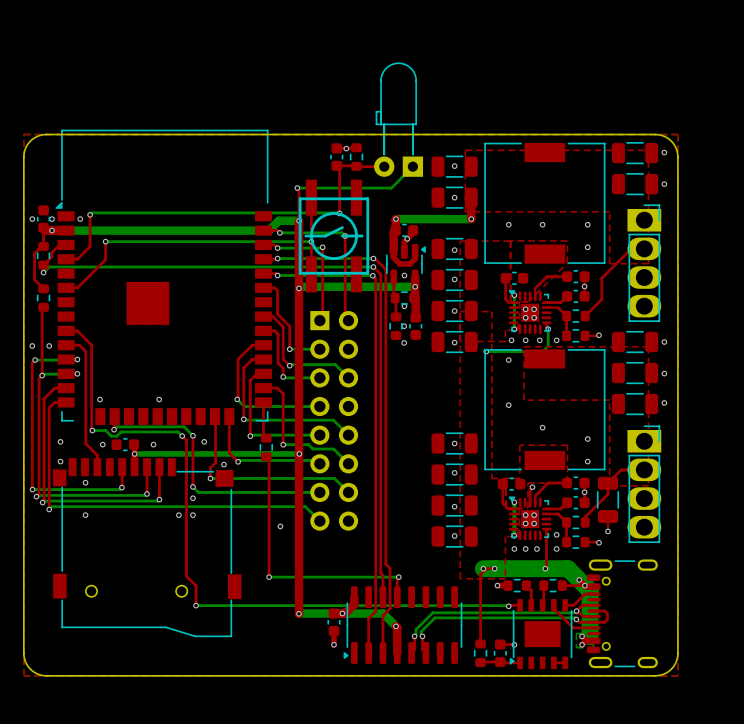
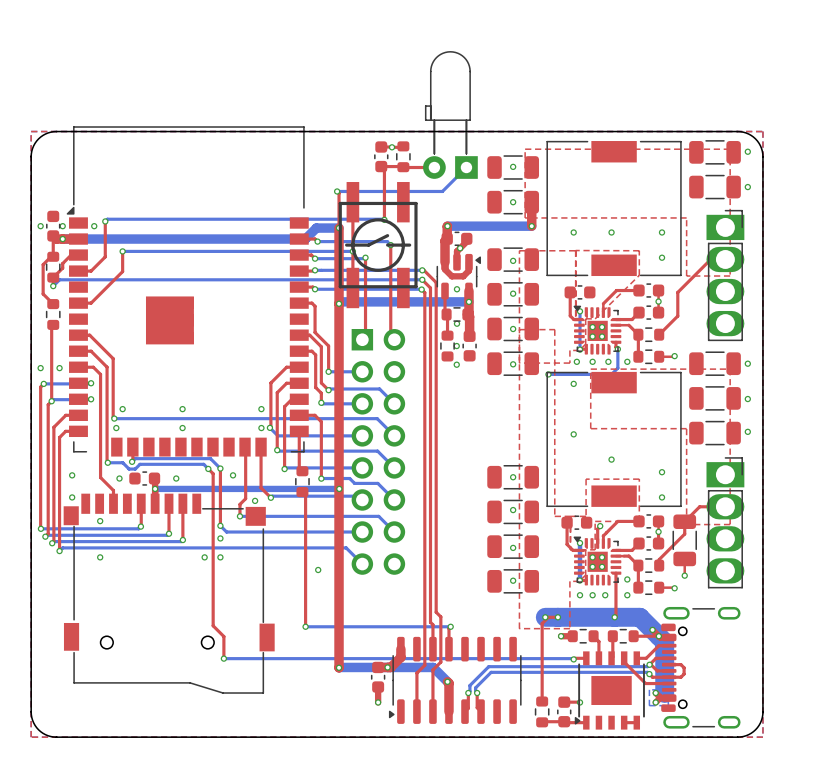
top track: none -> (78, 335) (89, 335) (113, 358) (114, 418)
via: none -> (122, 409)
via: none -> (182, 409)
via: none -> (261, 409)
bottom track: none -> (114, 418) (377, 418) (394, 435)
via: none -> (114, 418)
via: none -> (261, 428)

